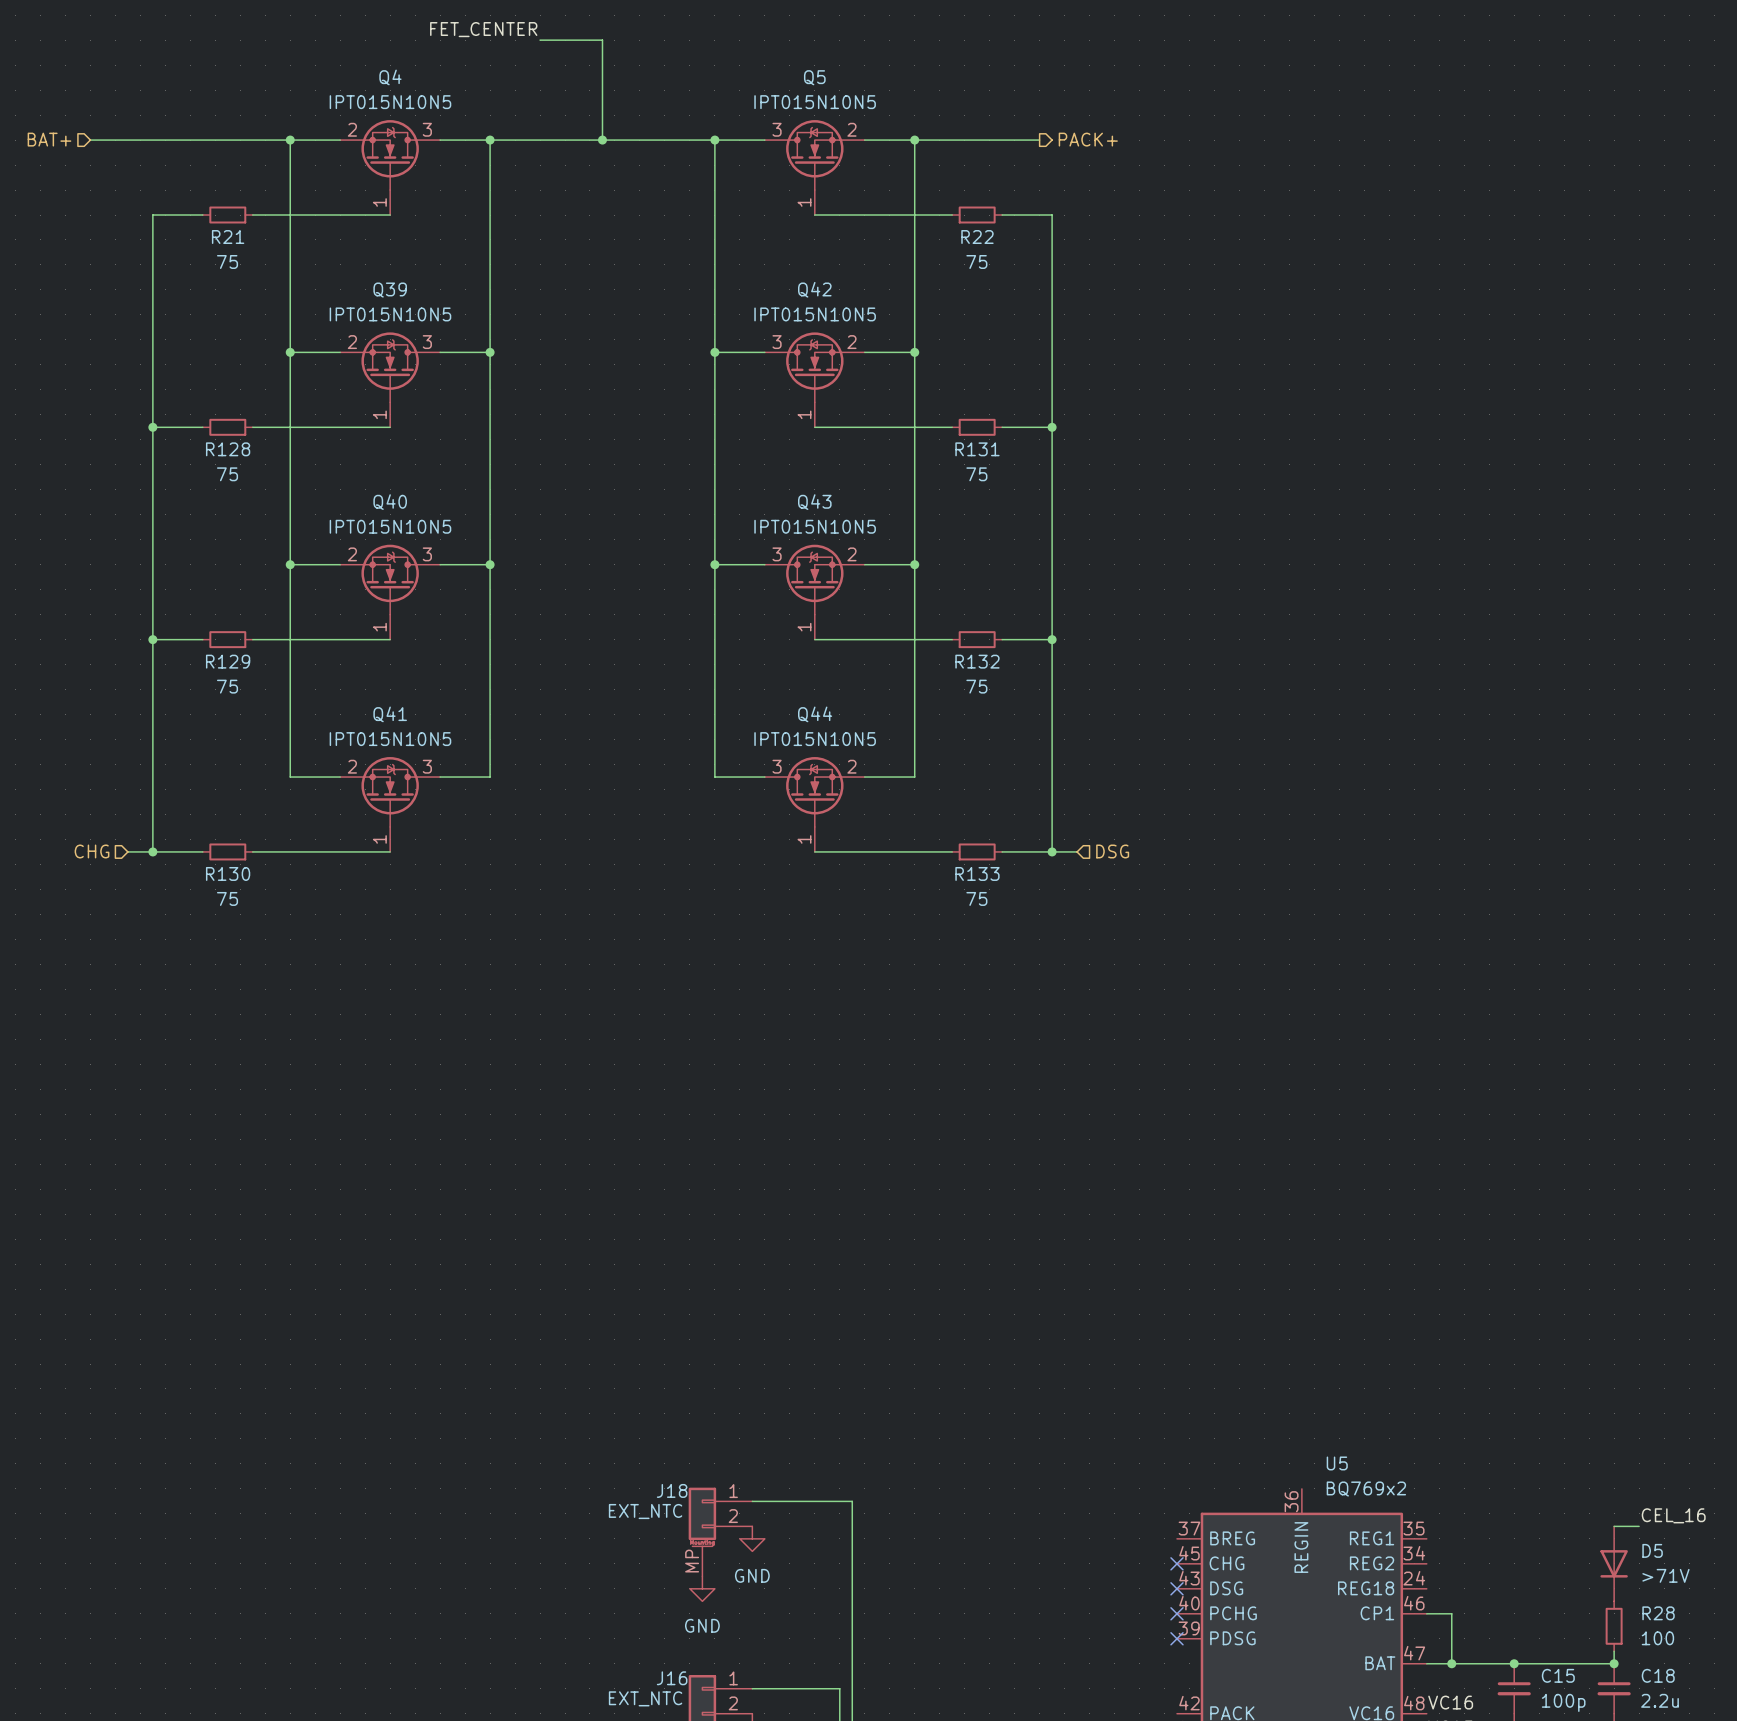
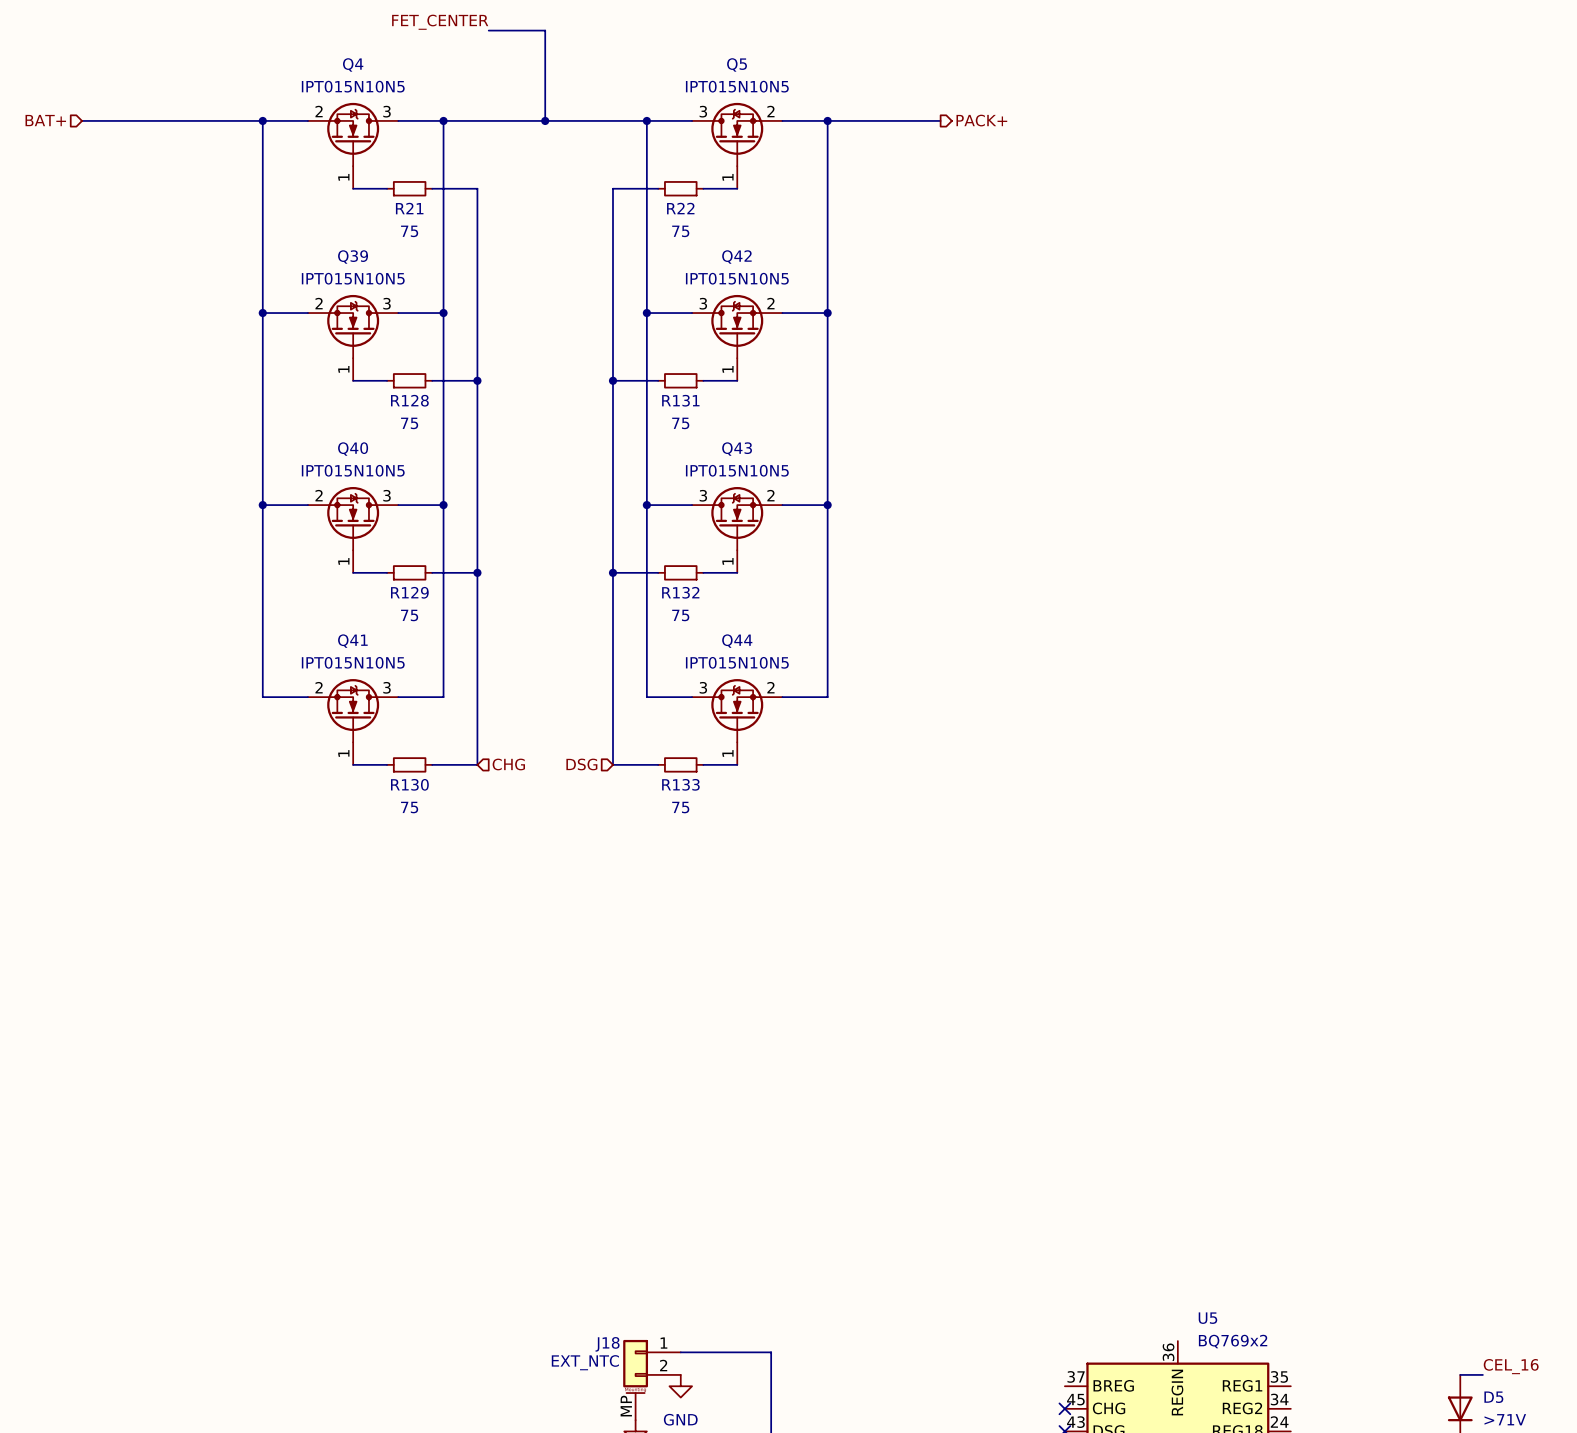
wire: (202, 215) (152, 215) (152, 851) -> none
R21 position: (227, 215) -> (409, 188)
wire: (252, 215) (390, 215) -> (387, 188) (353, 188)
wire: none -> (432, 188) (477, 188) (477, 764) (432, 764)
wire: none -> (658, 188) (612, 188) (612, 764) (658, 764)
wire: (814, 215) (952, 215) -> (737, 188) (703, 188)
R22 position: (977, 215) -> (680, 188)
wire: (1002, 215) (1052, 215) (1052, 851) -> none
wire: (152, 427) (202, 427) -> none
junction: (152, 427) -> none
R128 position: (227, 427) -> (409, 380)
wire: (252, 427) (390, 427) -> (387, 380) (353, 380)
wire: none -> (432, 380) (477, 380)
junction: none -> (477, 380)
wire: none -> (612, 380) (658, 380)
junction: none -> (612, 380)
wire: (814, 427) (952, 427) -> (737, 380) (703, 380)
R131 position: (977, 427) -> (680, 380)
wire: (1002, 427) (1052, 427) -> none
junction: (1052, 427) -> none
wire: (152, 639) (202, 639) -> none
junction: (152, 639) -> none
R129 position: (227, 639) -> (409, 572)
wire: (252, 639) (390, 639) -> (387, 572) (353, 572)
wire: none -> (432, 572) (477, 572)
junction: none -> (477, 572)
wire: none -> (612, 572) (658, 572)
junction: none -> (612, 572)
wire: (814, 639) (952, 639) -> (737, 572) (703, 572)
R132 position: (977, 639) -> (680, 572)
wire: (1002, 639) (1052, 639) -> none
junction: (1052, 639) -> none
hierarchical label: CHG (92, 851) -> none
wire: (127, 851) (202, 851) -> none
junction: (152, 851) -> none
R130 position: (227, 851) -> (409, 764)
wire: (252, 851) (390, 851) -> (387, 764) (353, 764)
hierarchical label: none -> CHG (508, 764)
hierarchical label: none -> DSG (581, 764)
wire: (814, 851) (952, 851) -> (737, 764) (703, 764)
R133 position: (977, 851) -> (680, 764)
wire: (1002, 851) (1077, 851) -> none
junction: (1052, 851) -> none
hierarchical label: DSG (1112, 851) -> none

